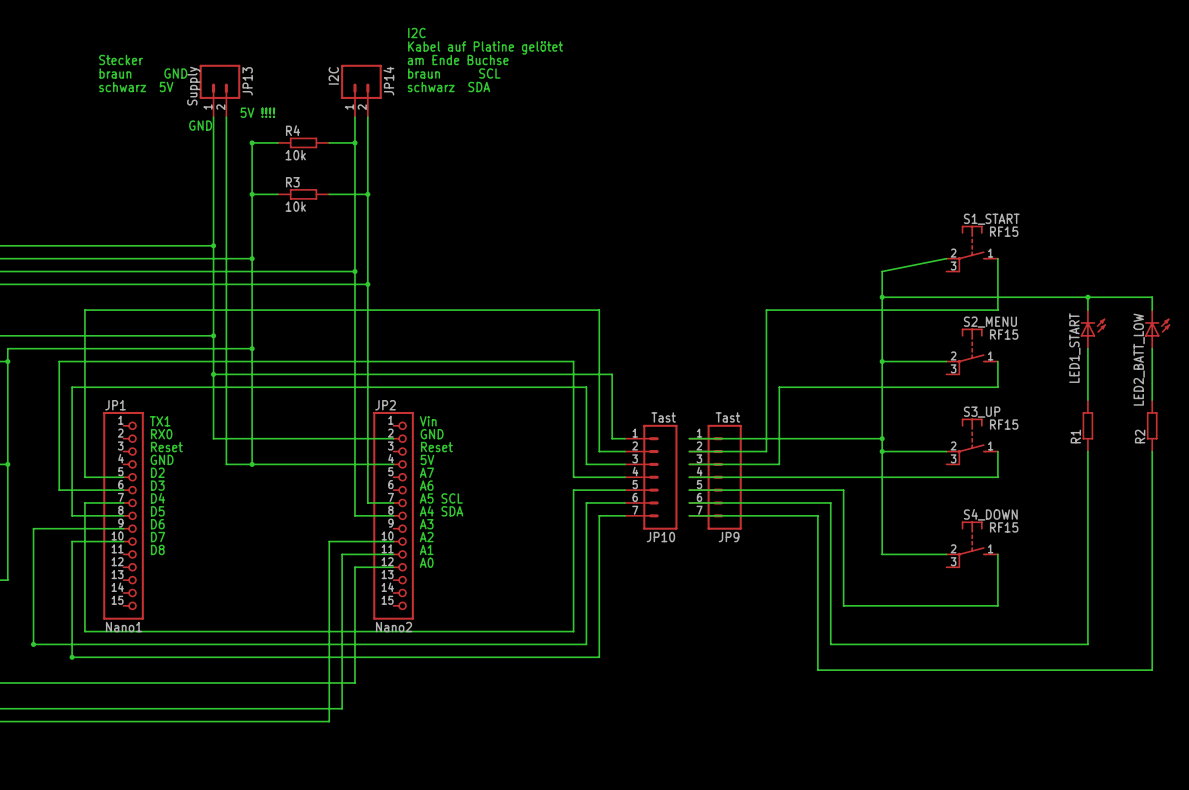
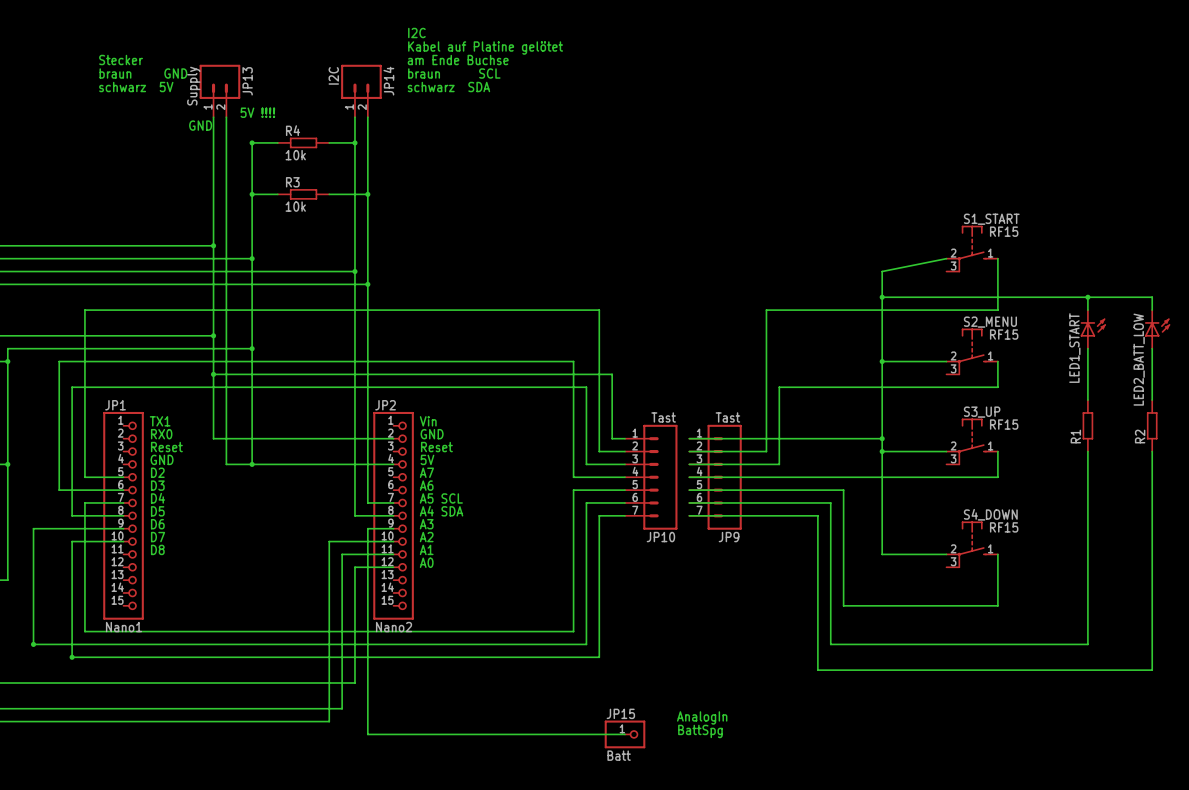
wire: none -> (393, 528) (367, 528) (367, 734) (625, 734)
text: none -> AnalogIn (702, 717)
text: none -> BattSpg (700, 731)
JP15: none -> Batt (625, 734)

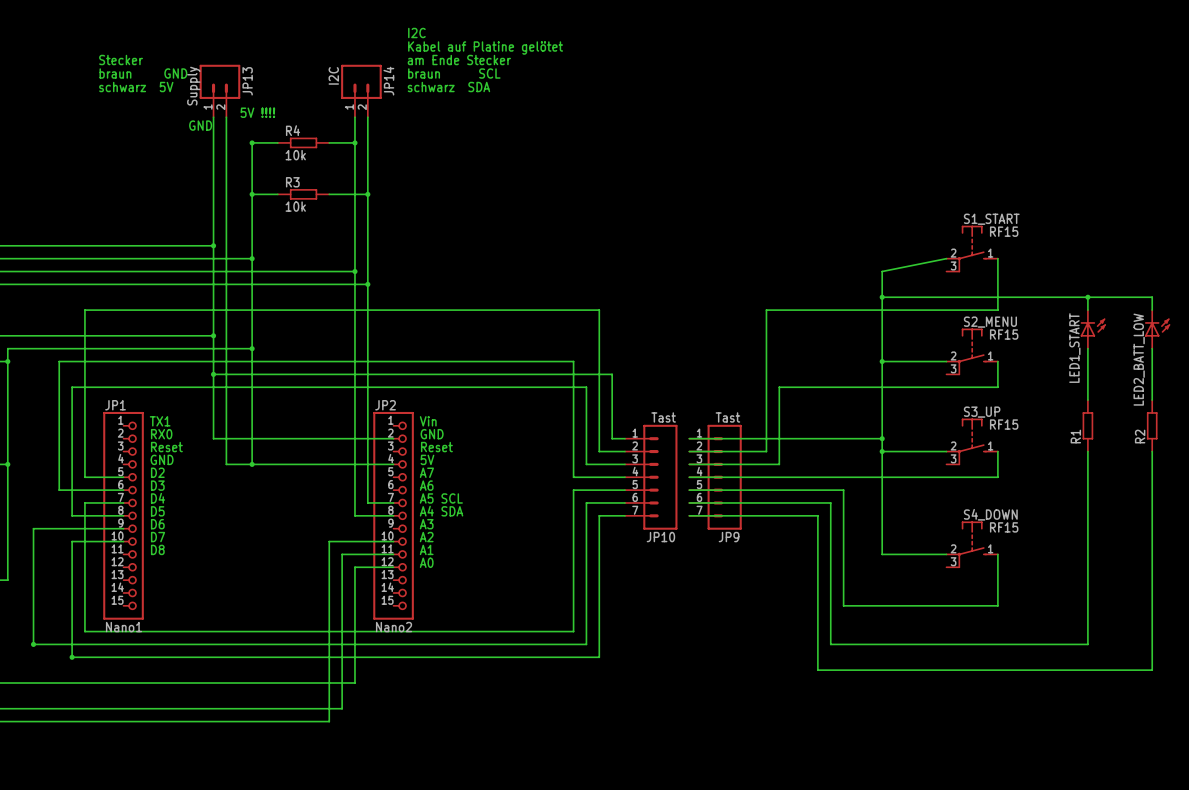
text: am Ende Buchse (458, 60) -> am Ende Stecker (459, 60)
wire: (393, 528) (367, 528) (367, 734) (625, 734) -> none
text: AnalogIn (702, 717) -> none
text: BattSpg (700, 731) -> none
JP15: Batt (625, 734) -> none

